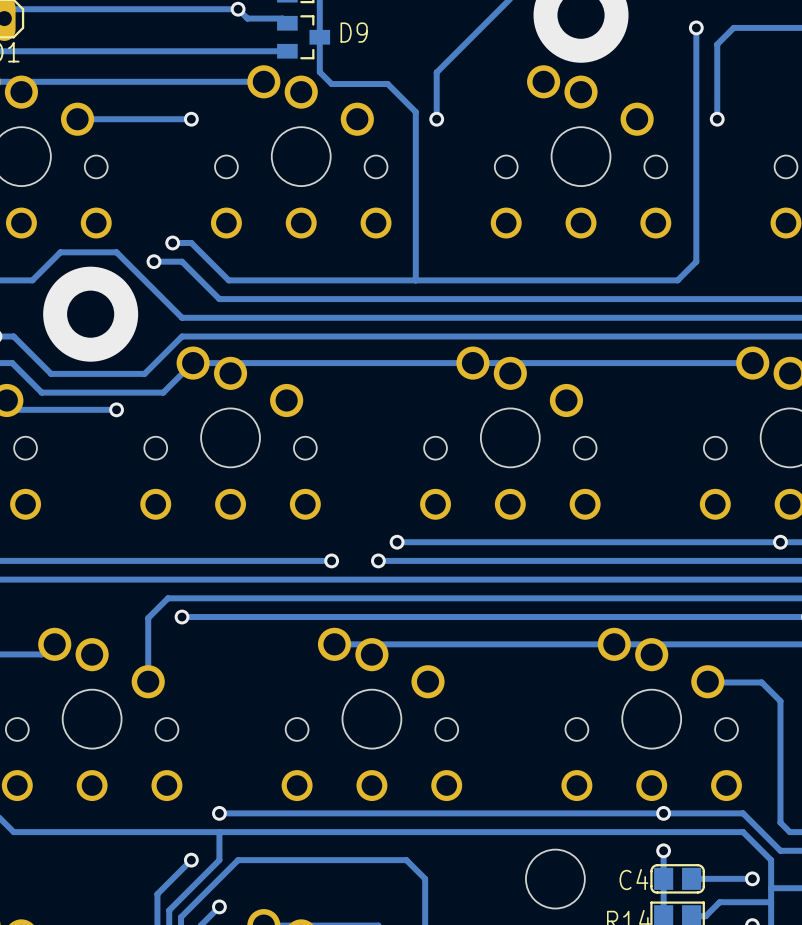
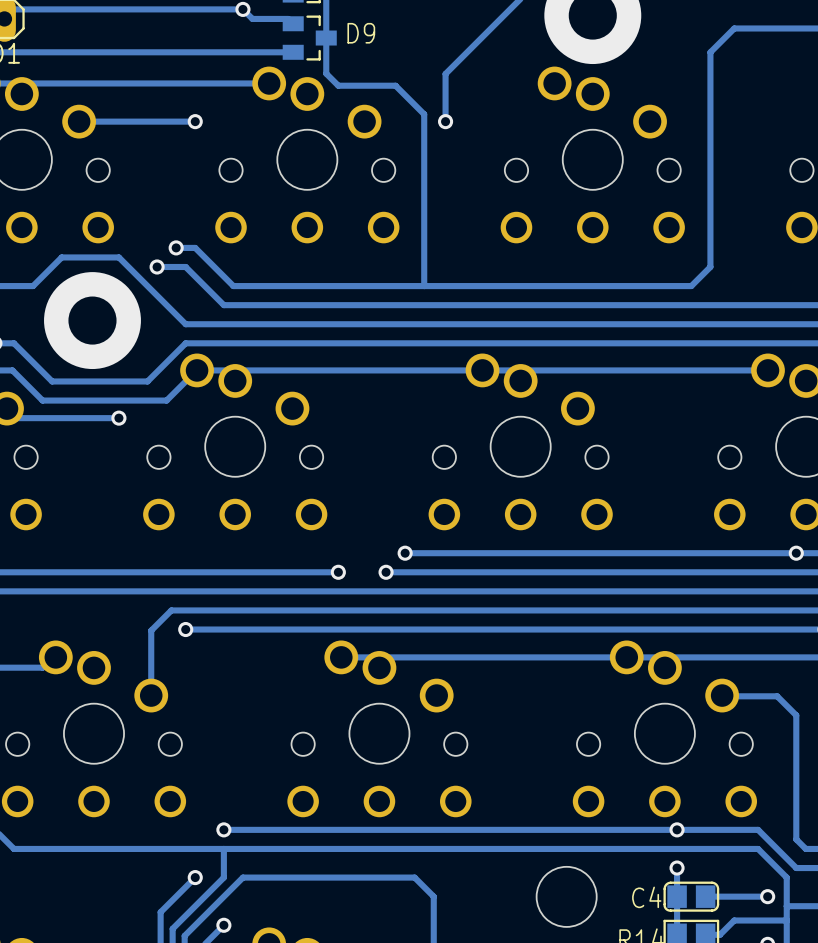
track: (696, 27) (696, 51) -> (748, 28) (734, 28) (710, 52)
via: (696, 27) -> none
track: (733, 27) (717, 44) (717, 119) -> none
via: (717, 119) -> none

